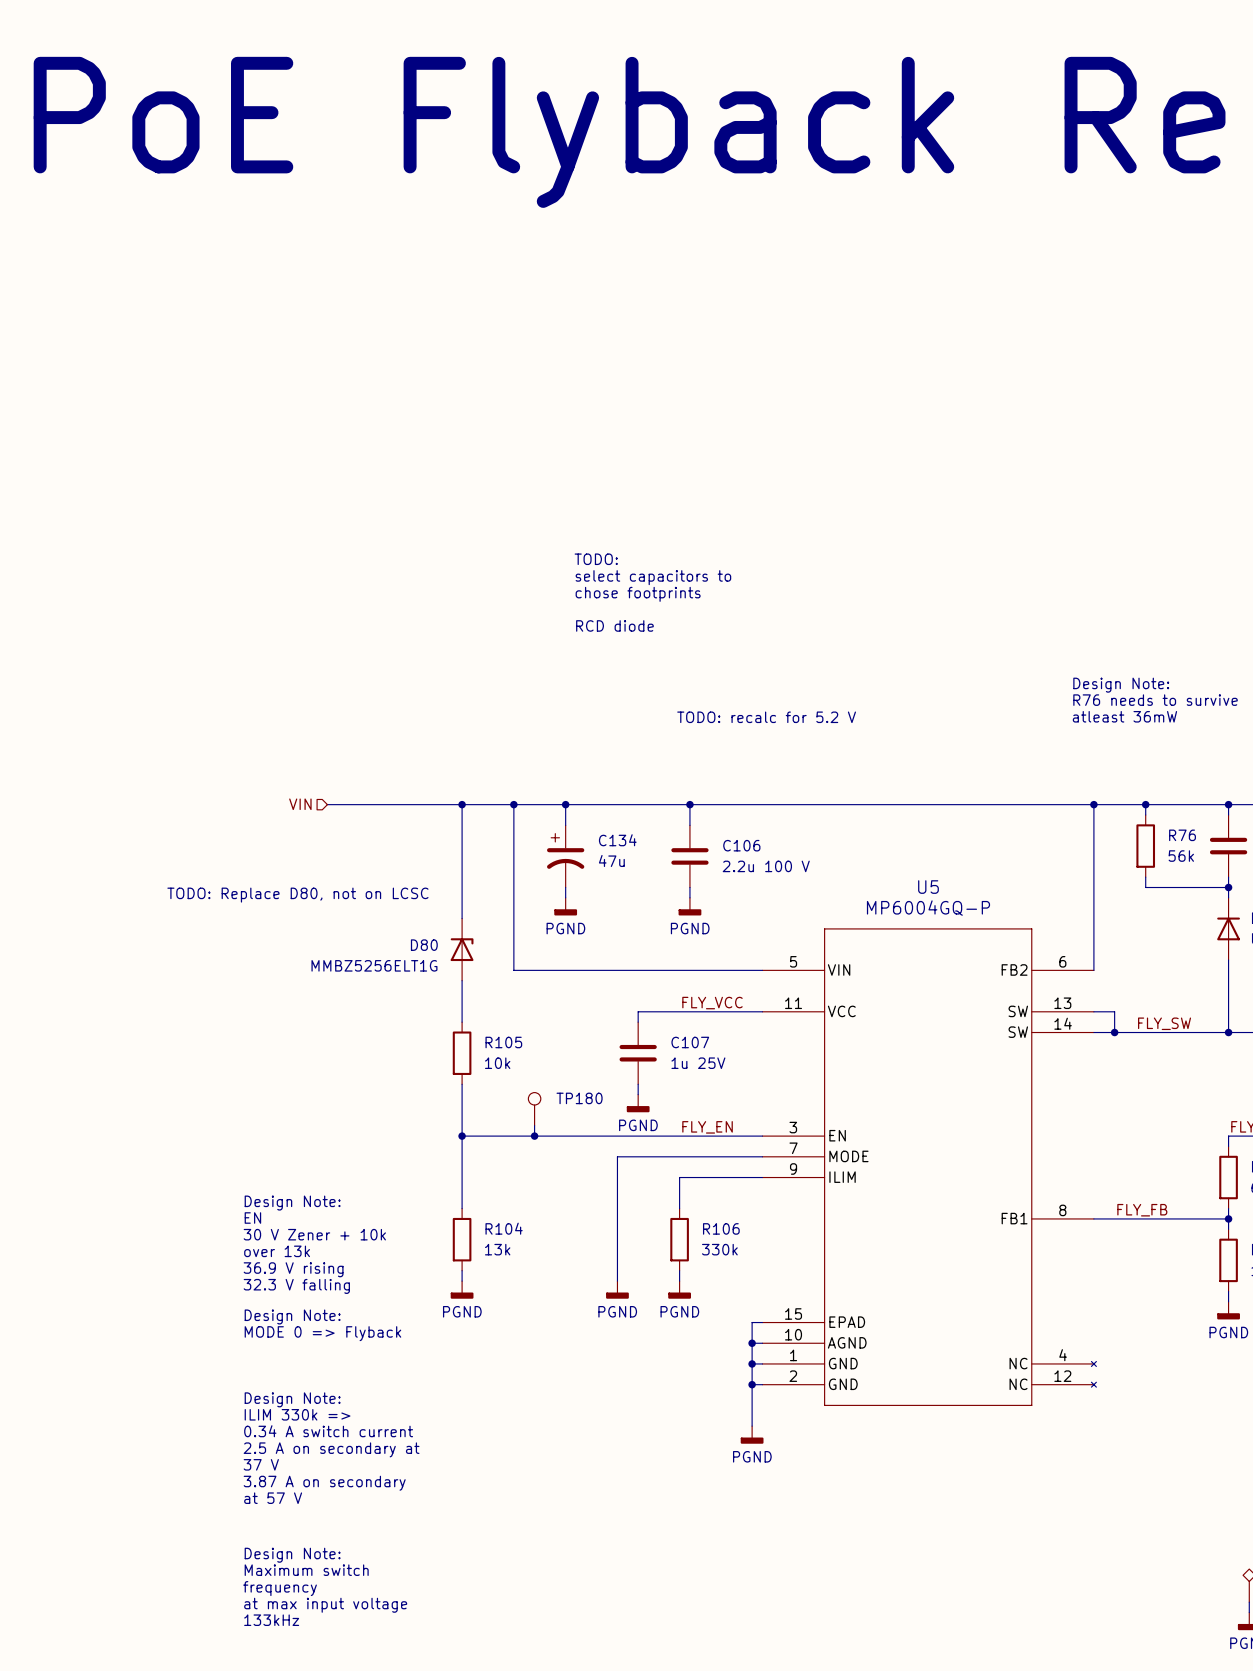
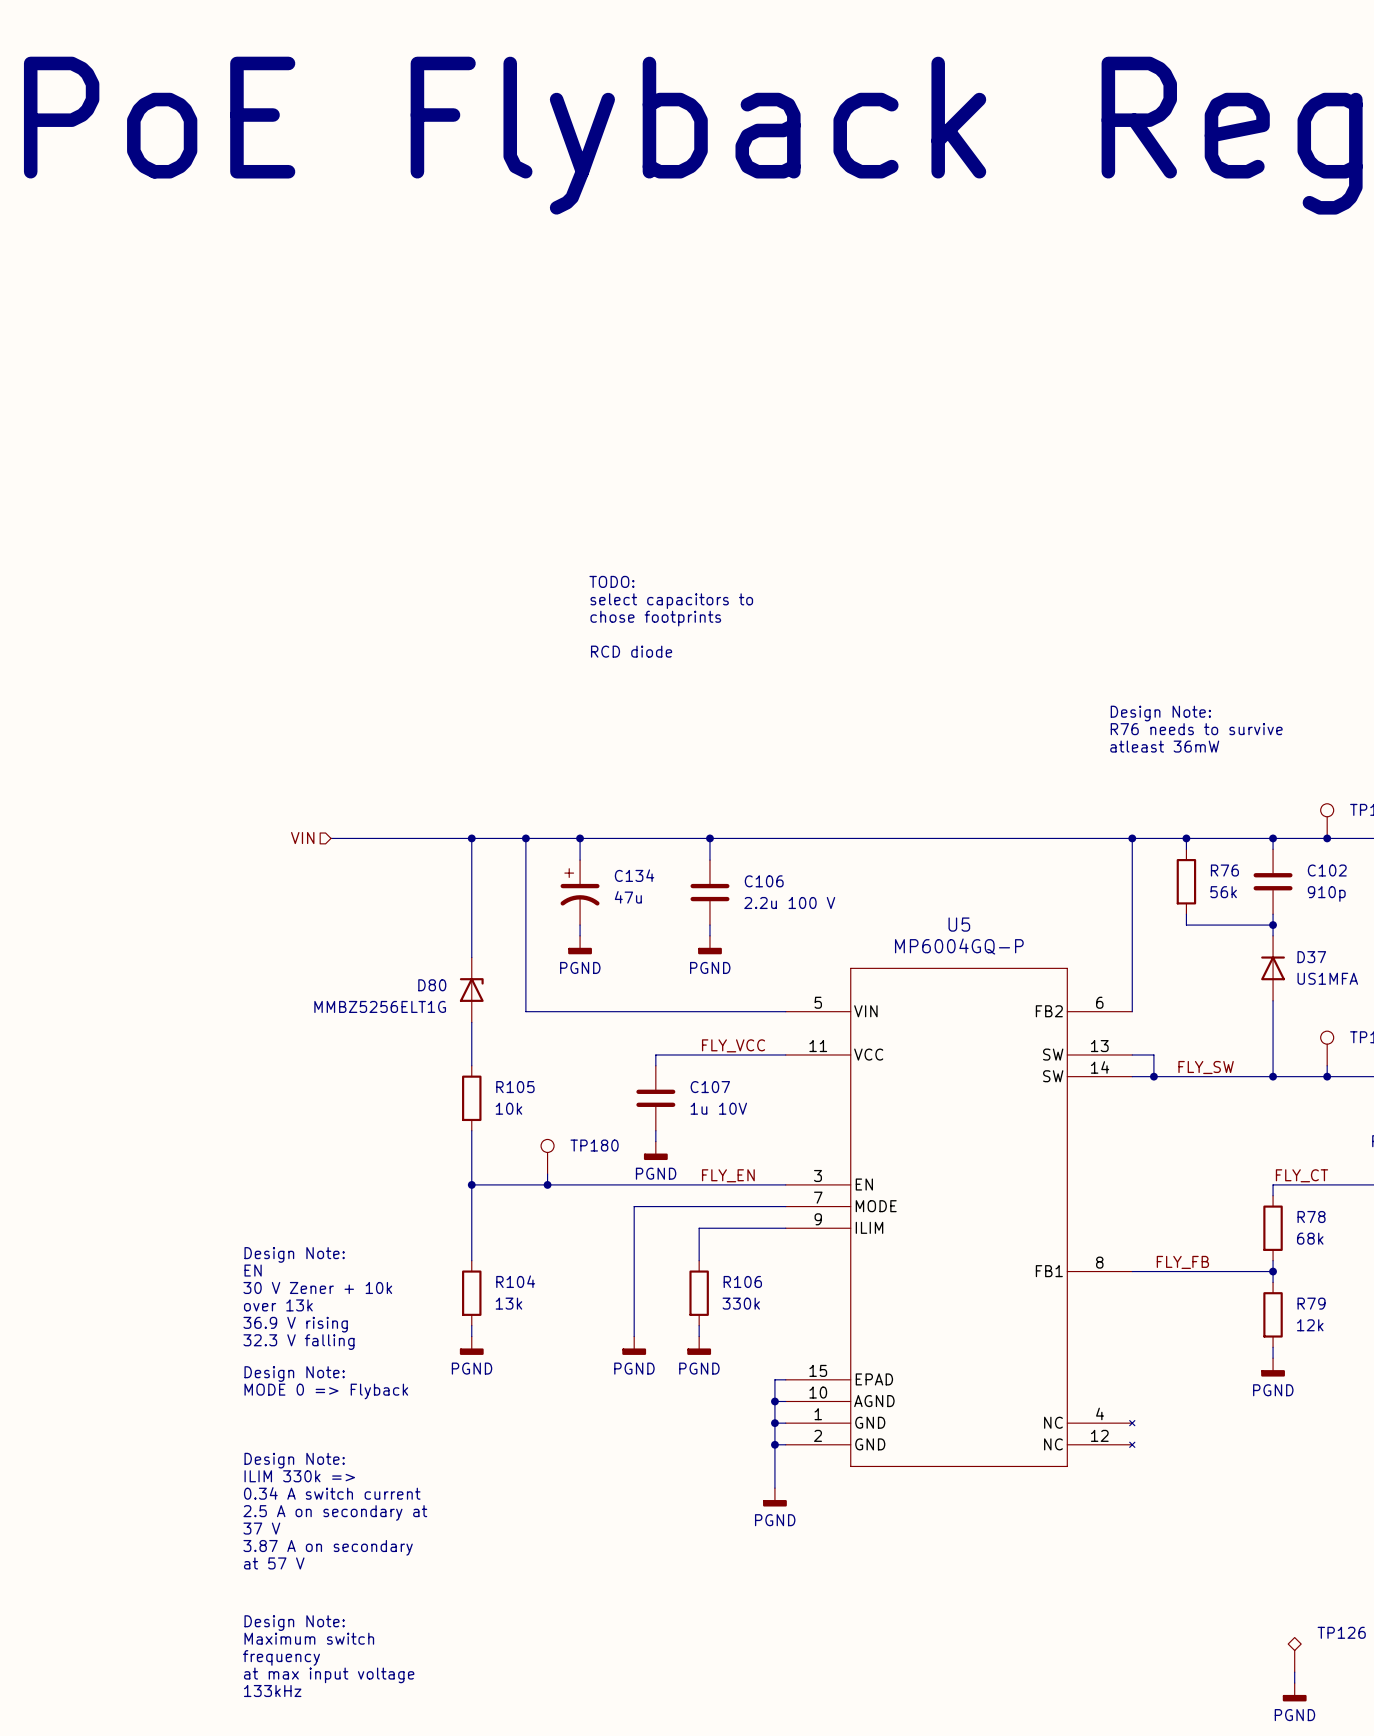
text: TODO: recalc for 5.2 V (766, 717) -> none
text: TODO: Replace D80, not on LCSC (297, 895) -> none
C107 value: 1u 25V (698, 1063) -> 1u 10V (718, 1108)

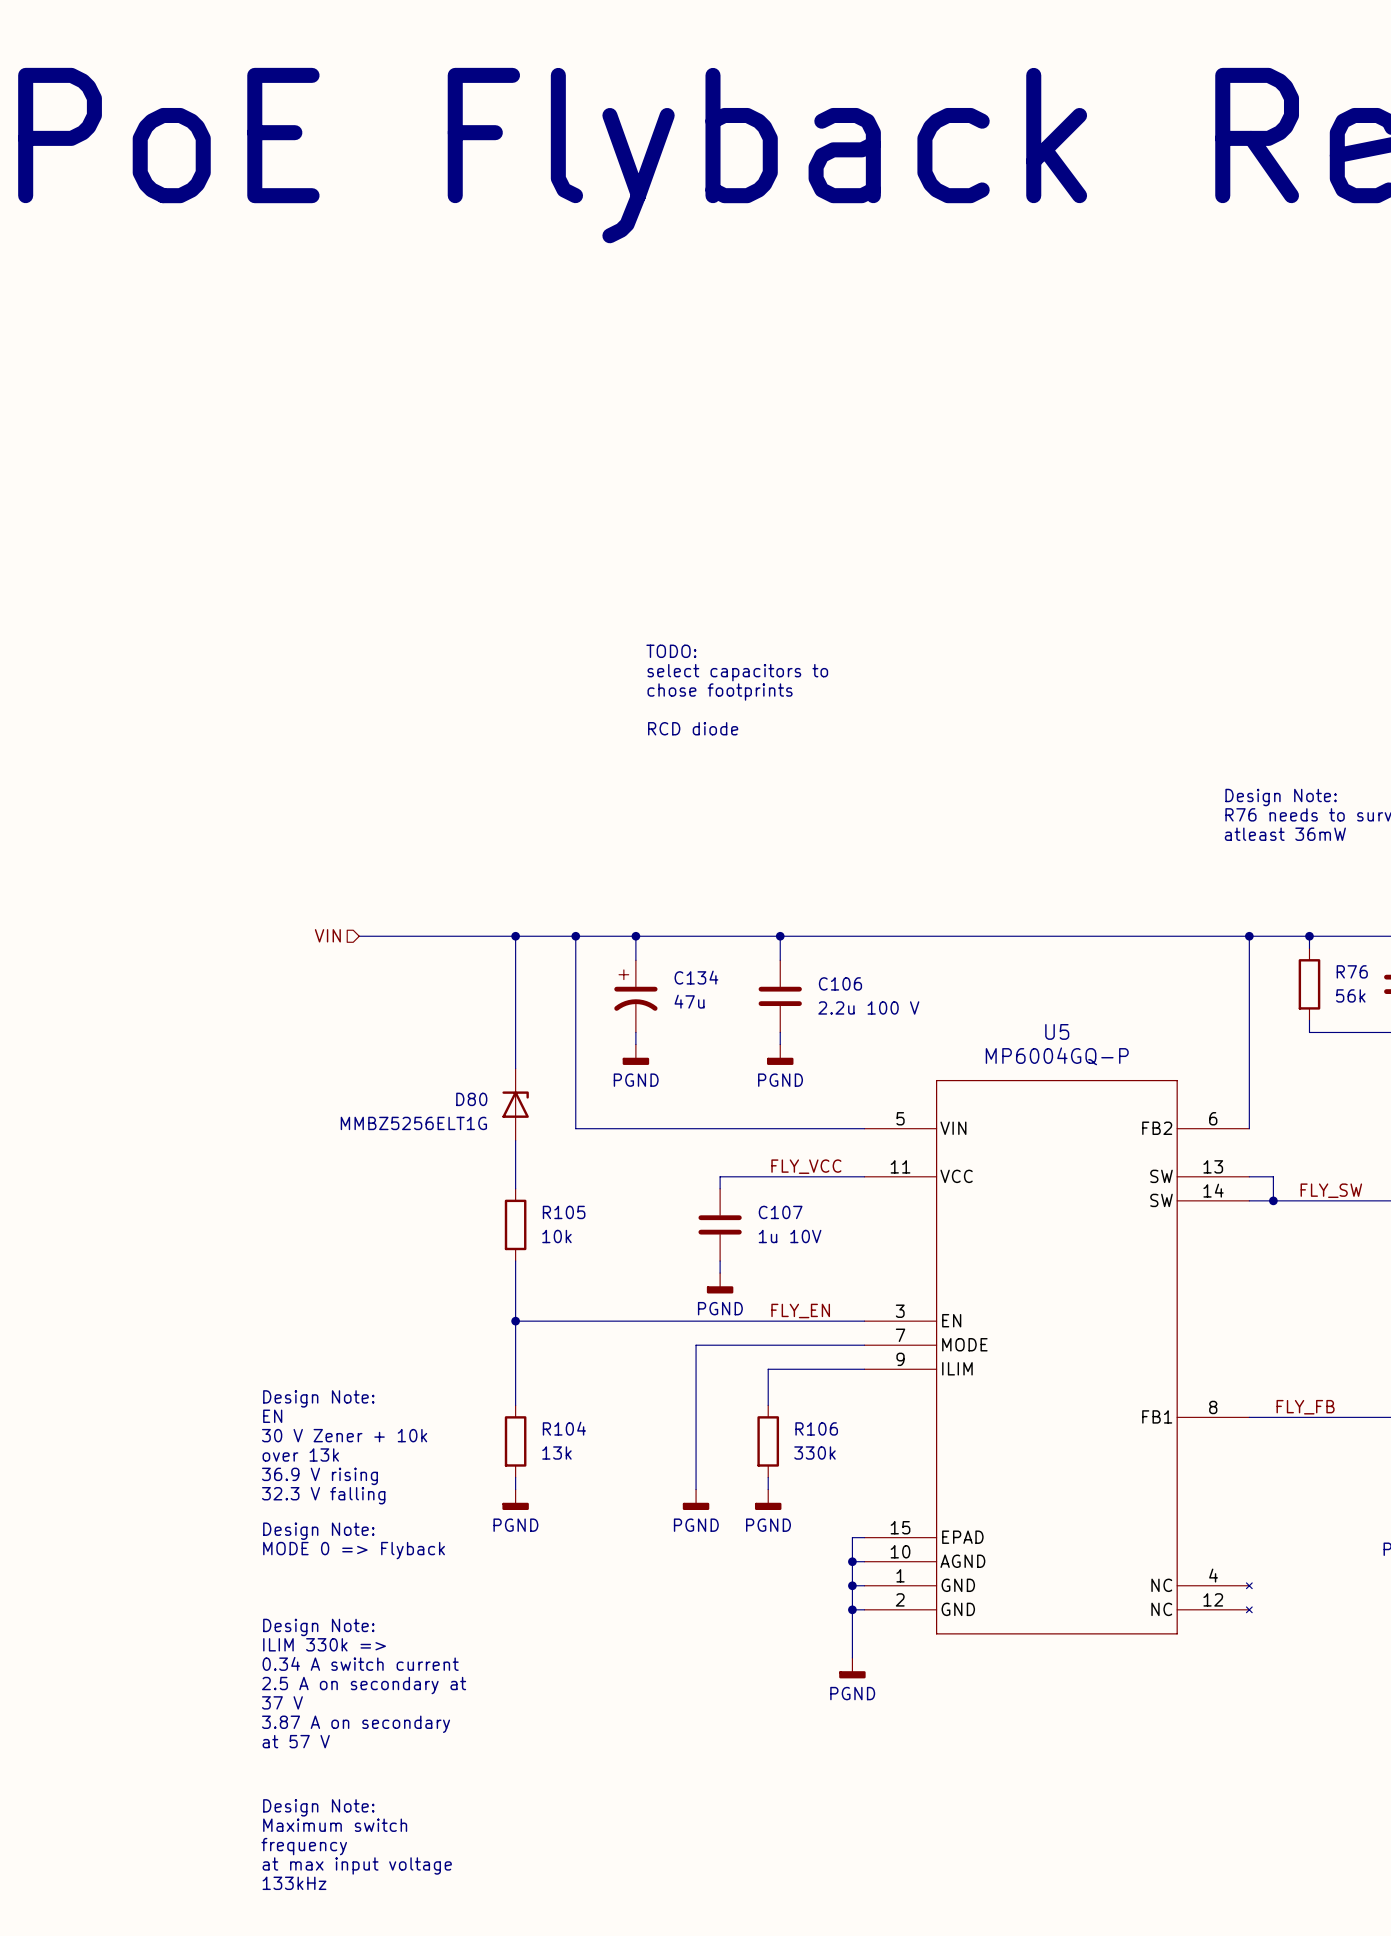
TP180: (547, 1156) -> none
wire: (547, 1174) (547, 1184) -> none
junction: (547, 1184) -> none

